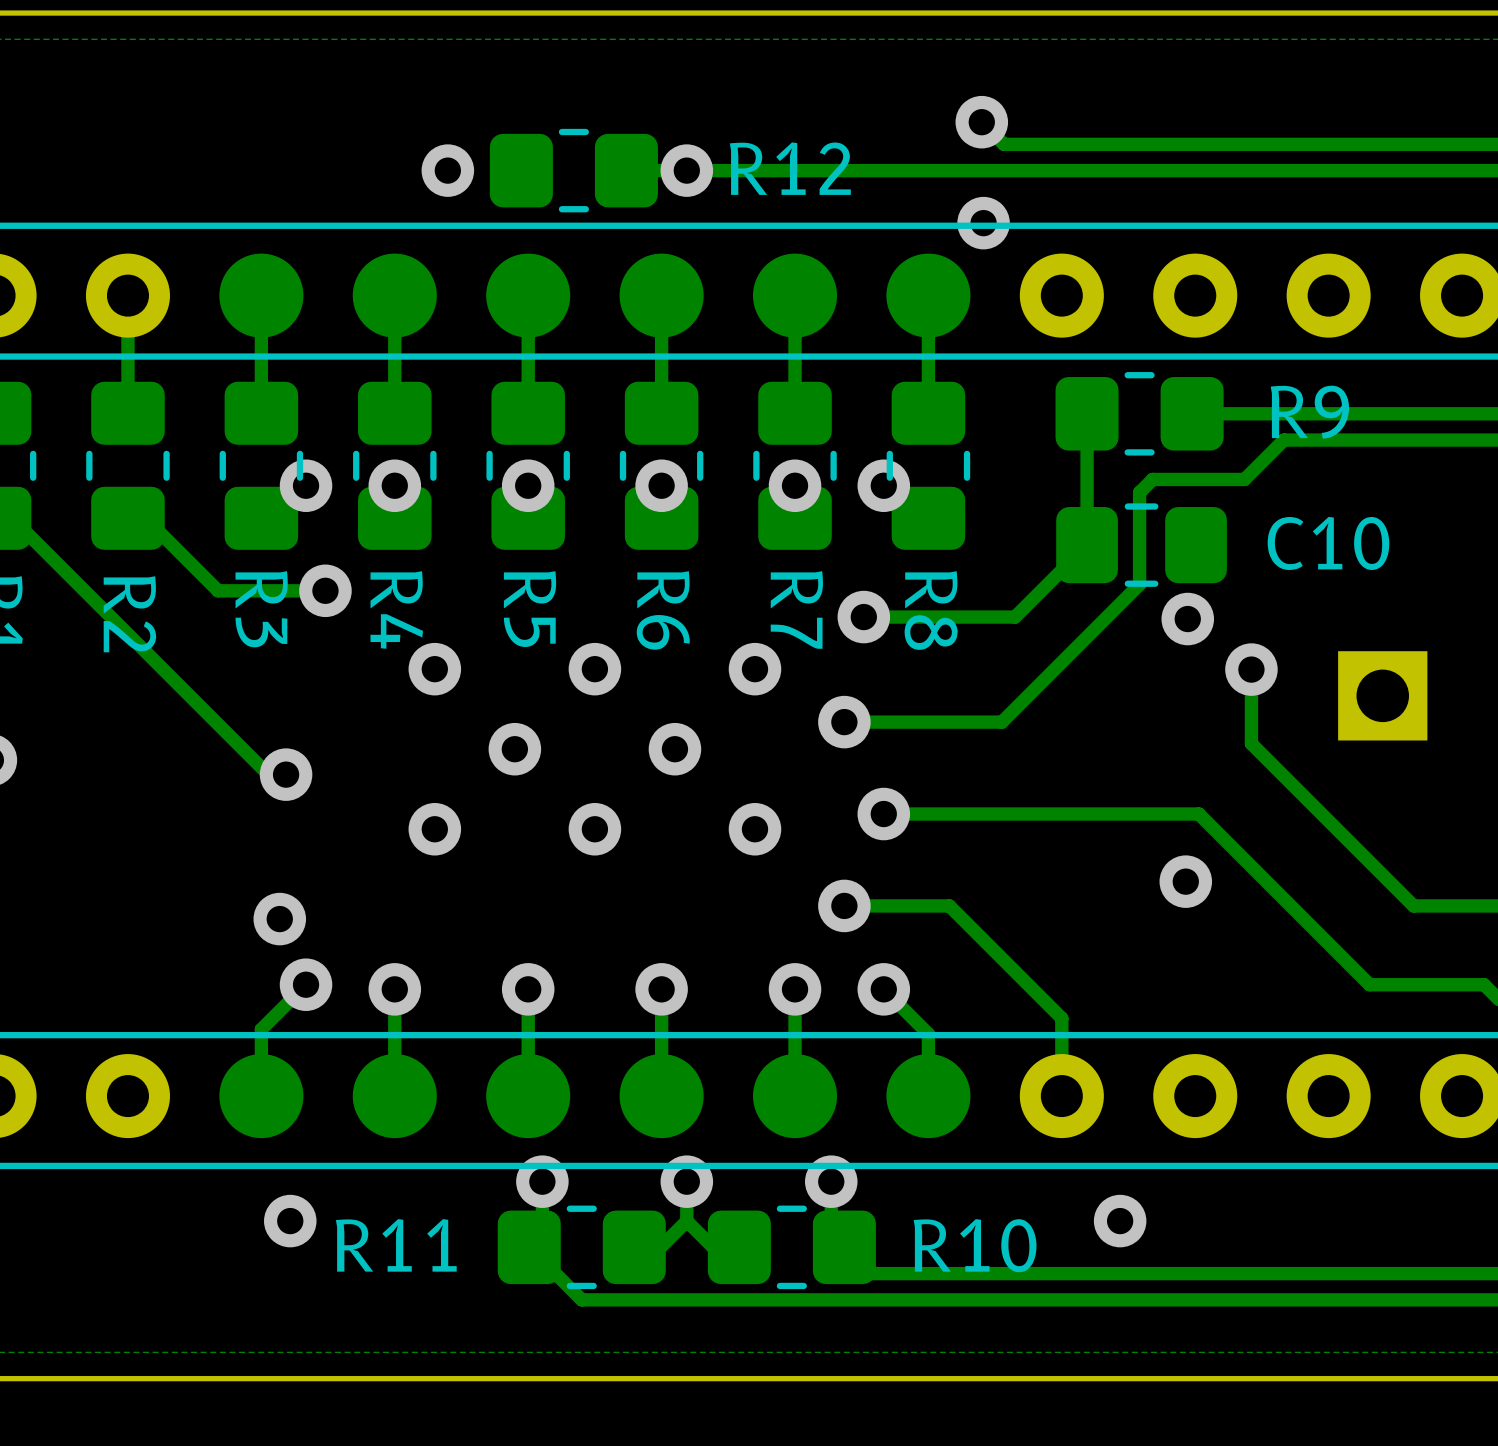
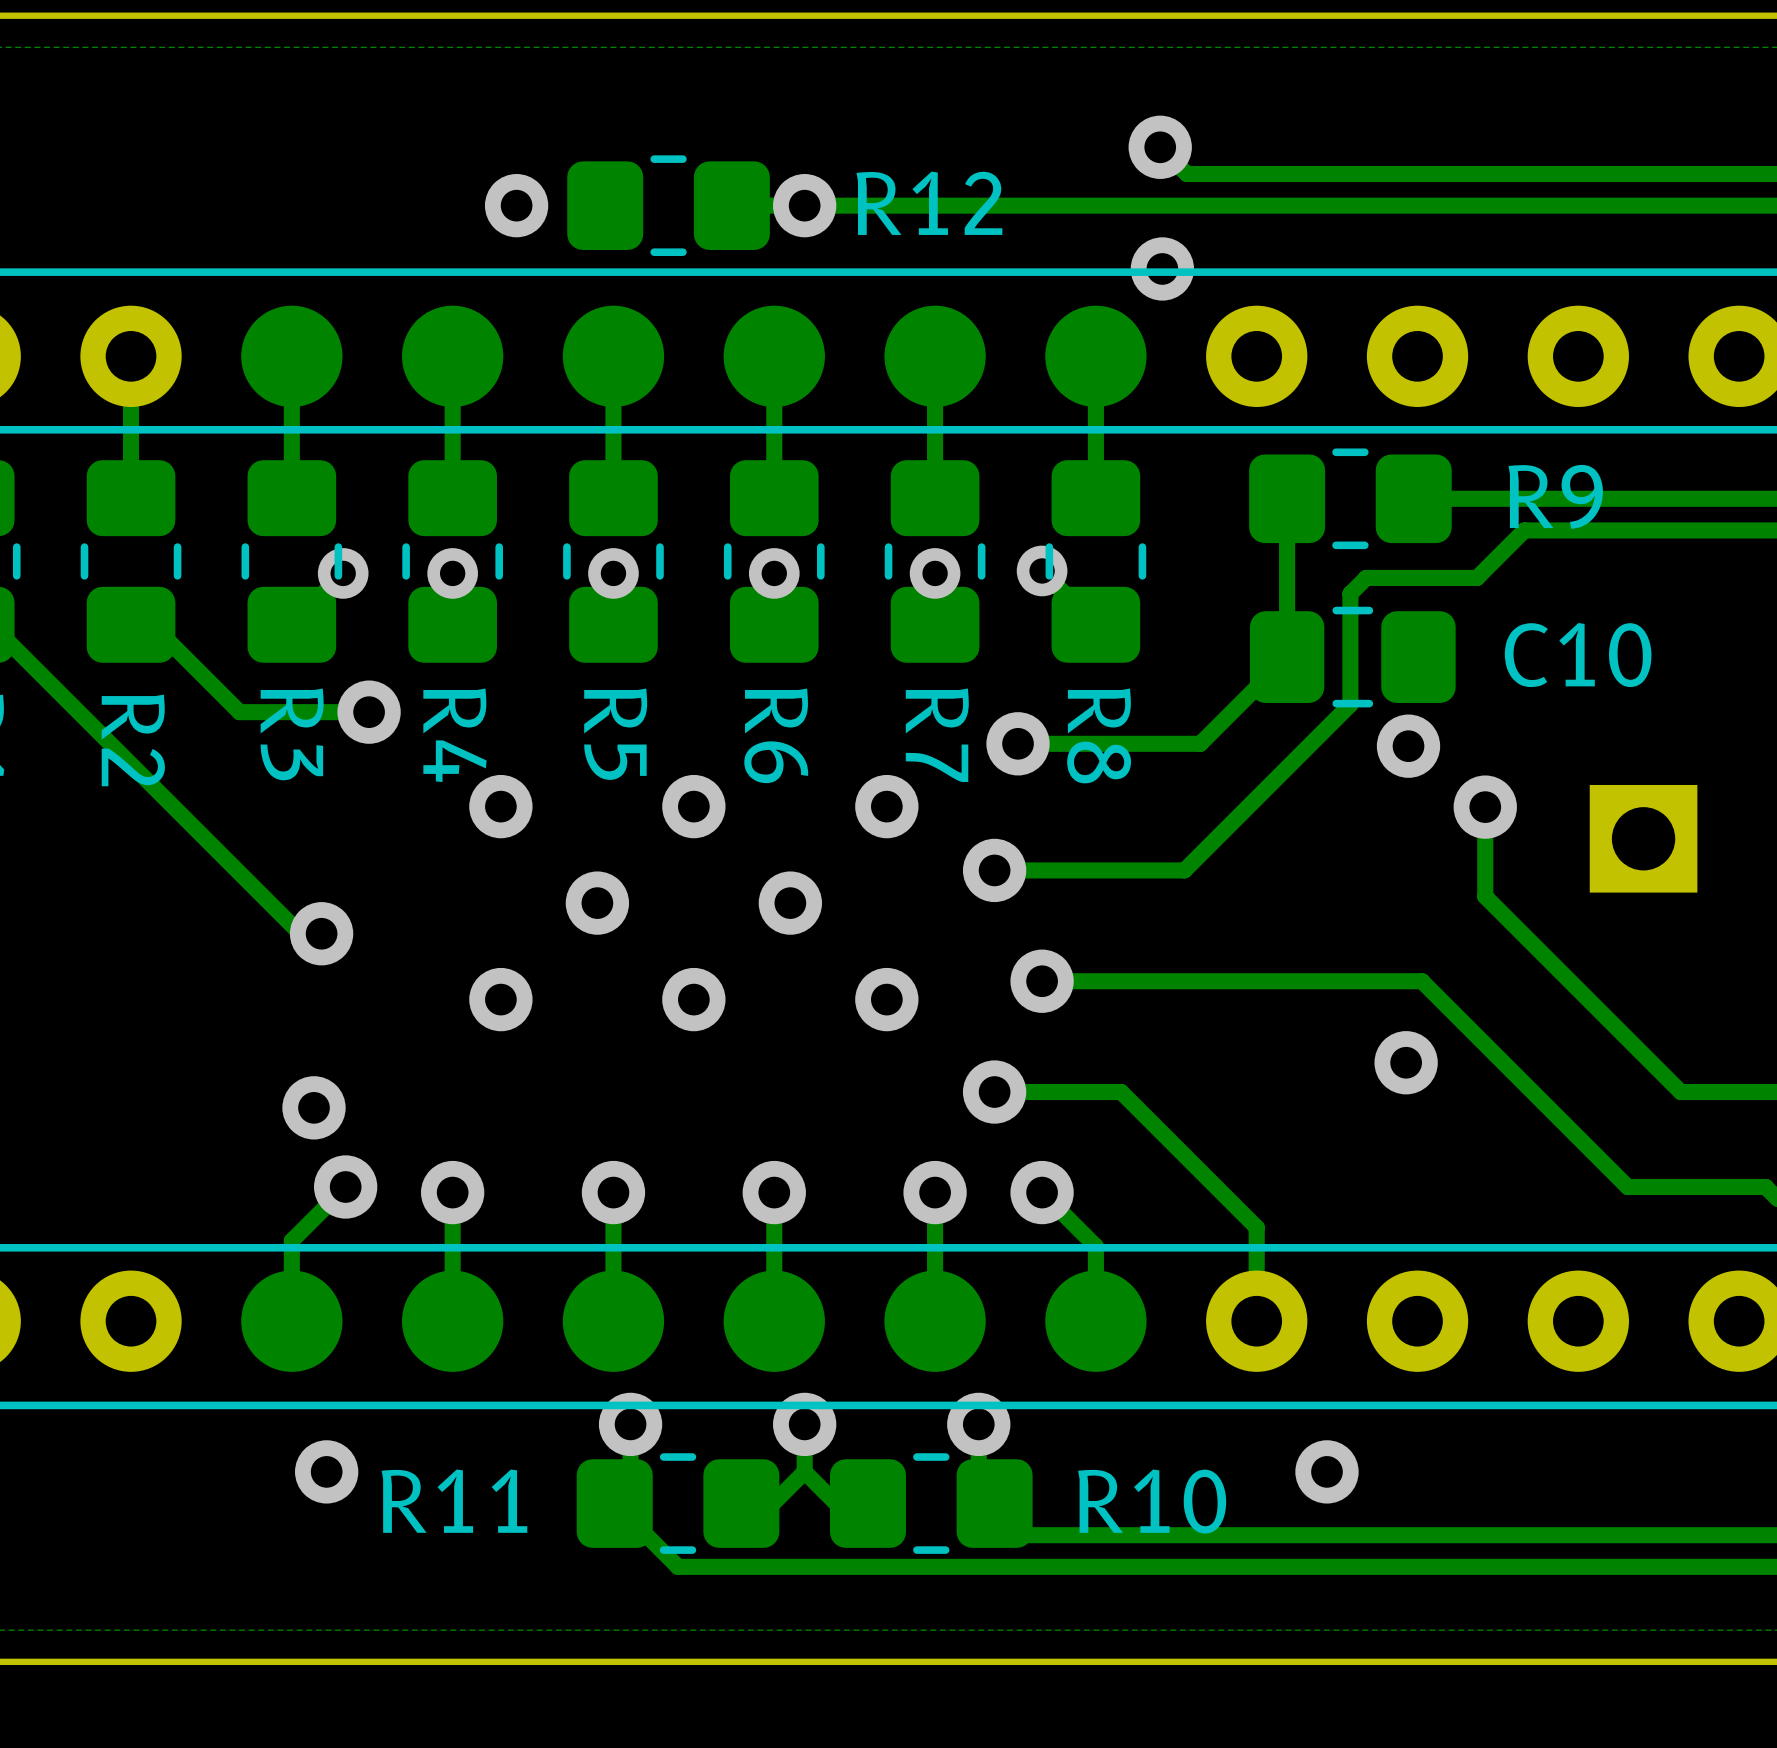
via size: [279, 459, 333, 513] -> [317, 548, 369, 599]
via size: [368, 459, 422, 513] -> [427, 548, 478, 599]
via size: [501, 459, 555, 513] -> [588, 548, 639, 599]
via size: [635, 459, 688, 513] -> [748, 548, 800, 599]
via size: [768, 459, 822, 513] -> [909, 548, 961, 599]
via size: [857, 459, 911, 513] -> [1016, 545, 1068, 597]

